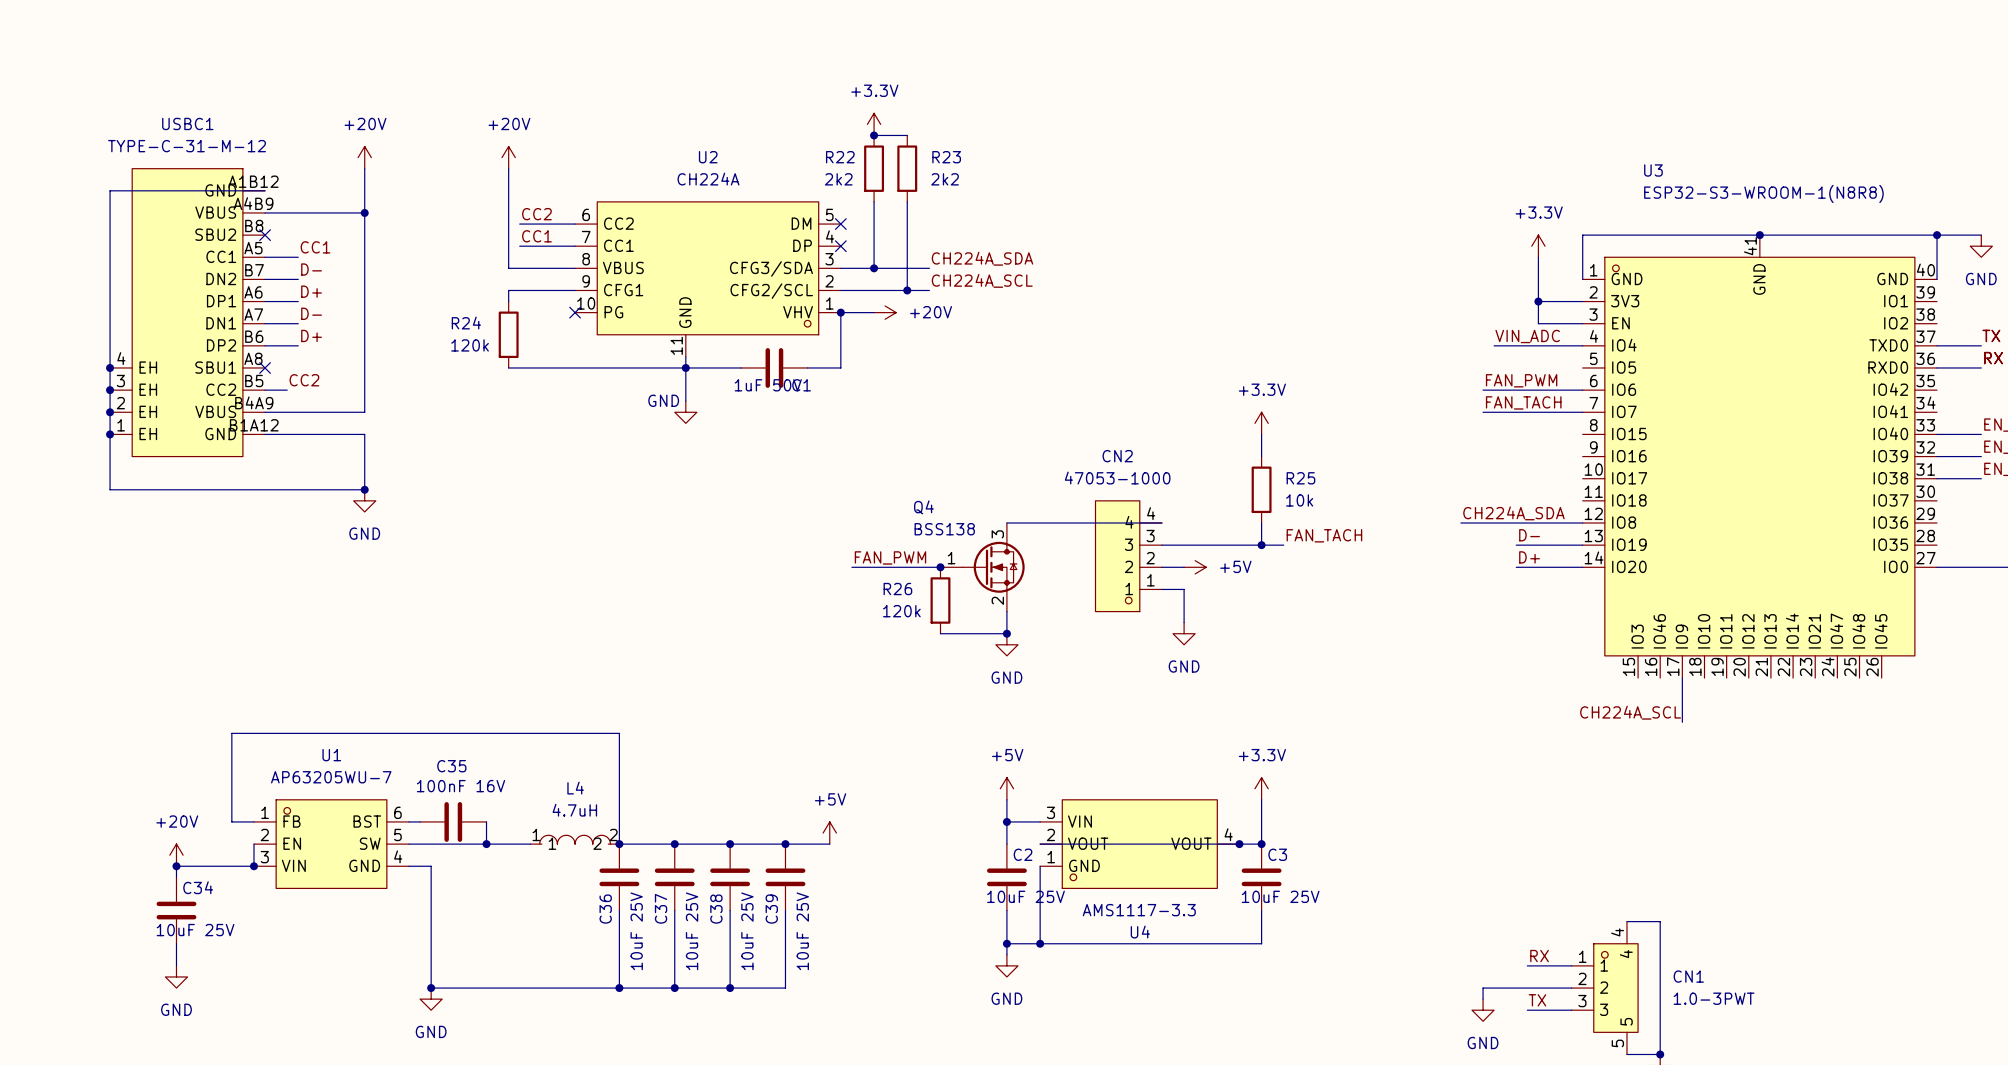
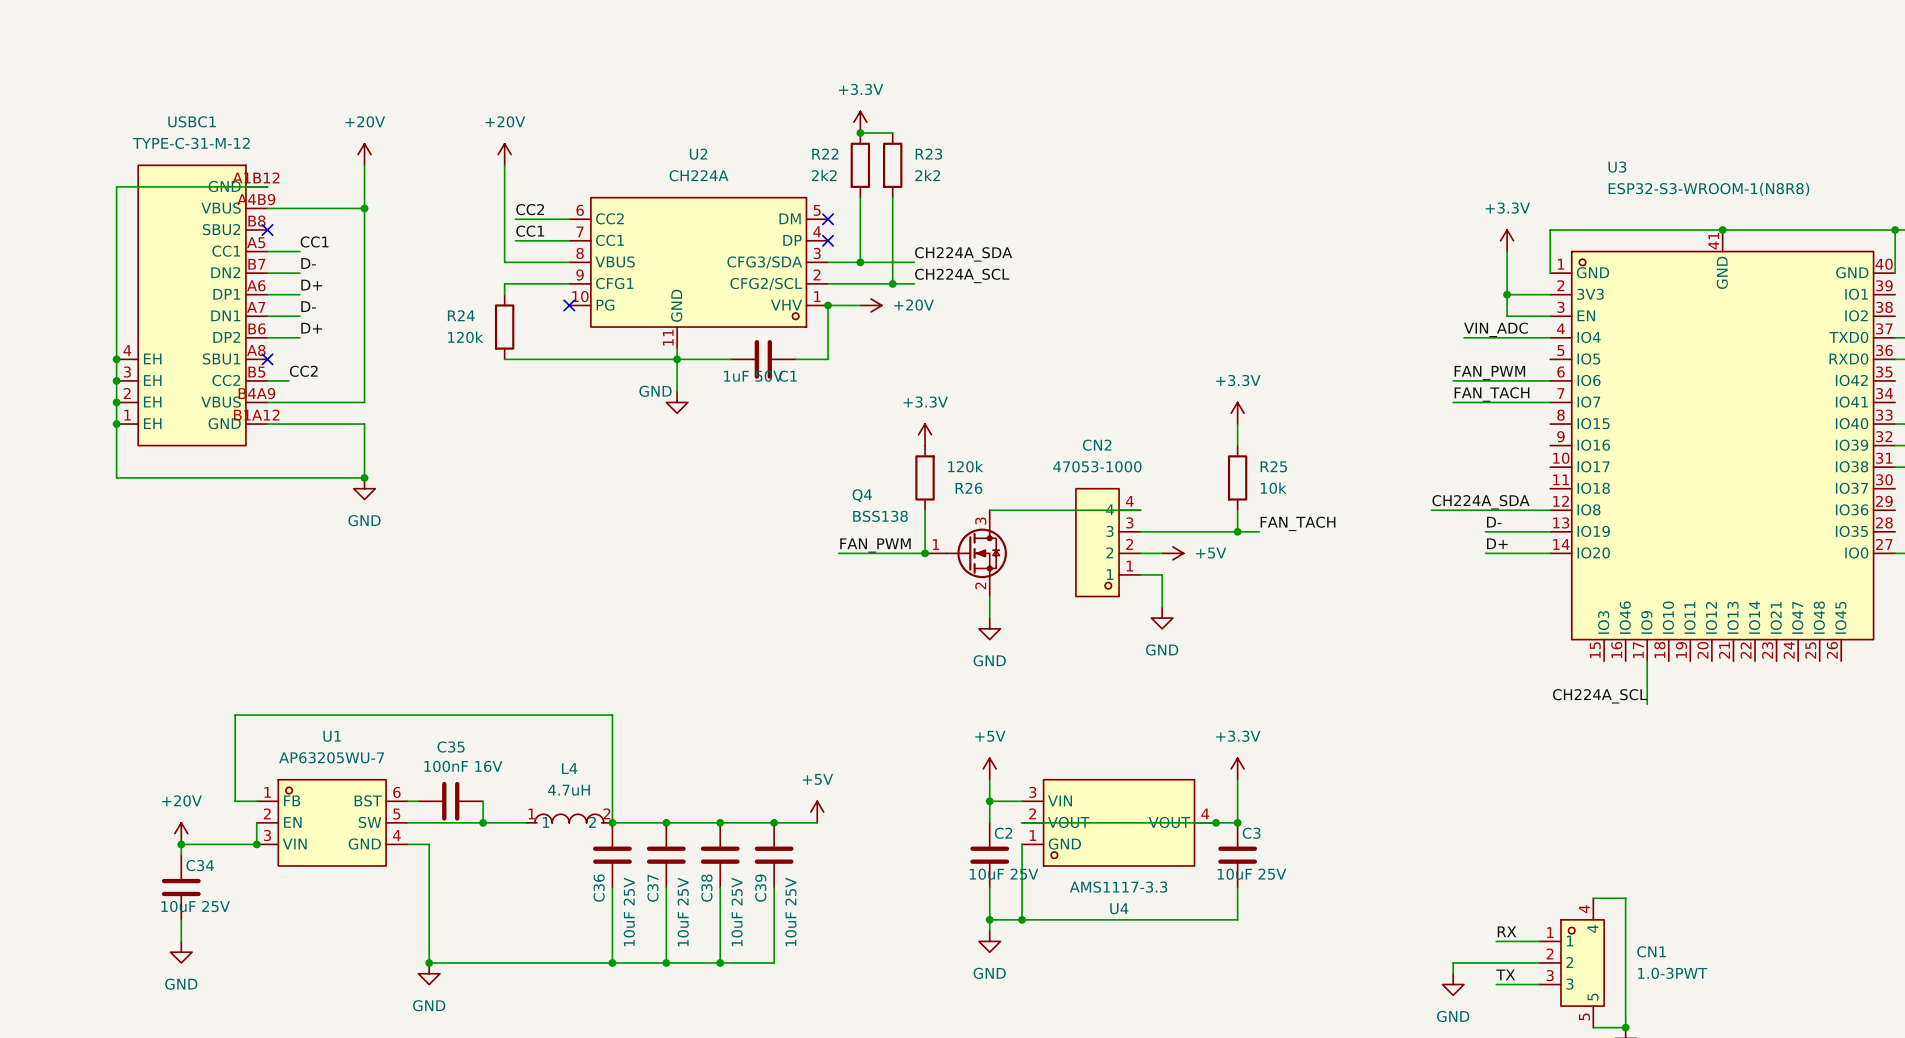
power symbol: none -> +3.3V (925, 434)
Q4 name position: Q4 (923, 507) -> Q4 (862, 495)
wire: none -> (925, 510) (925, 553)
Q4 value position: BSS138 (944, 529) -> BSS138 (880, 516)
R26 name position: R26 (897, 589) -> R26 (968, 488)
R26 position: (940, 600) -> (925, 477)
R26 value position: 120k (901, 611) -> 120k (965, 466)
wire: (940, 633) (1006, 633) -> none
junction: (1006, 633) -> none

